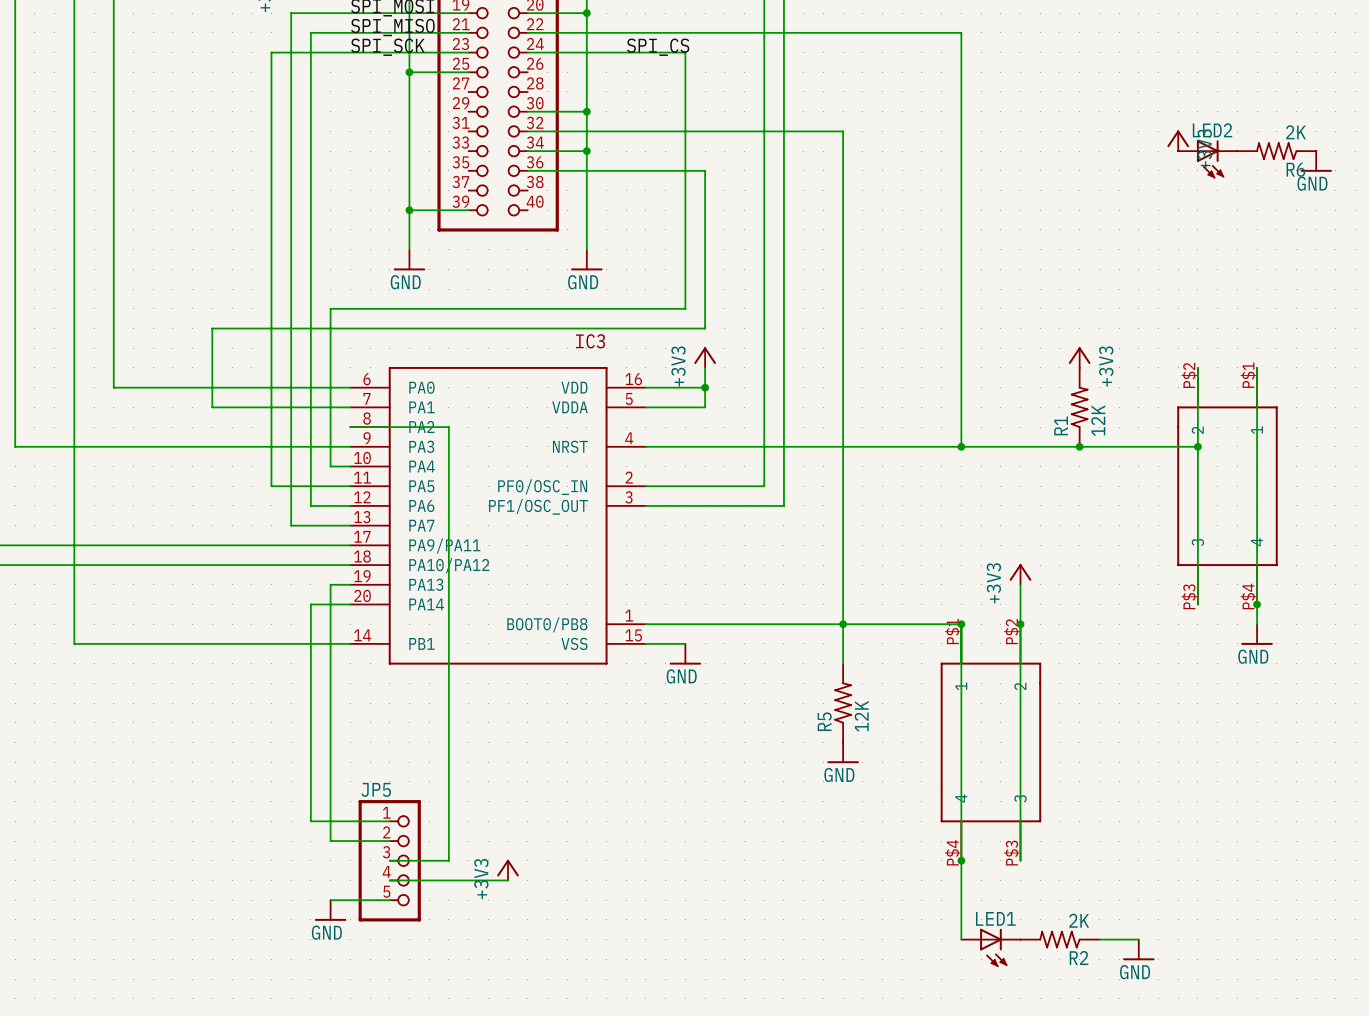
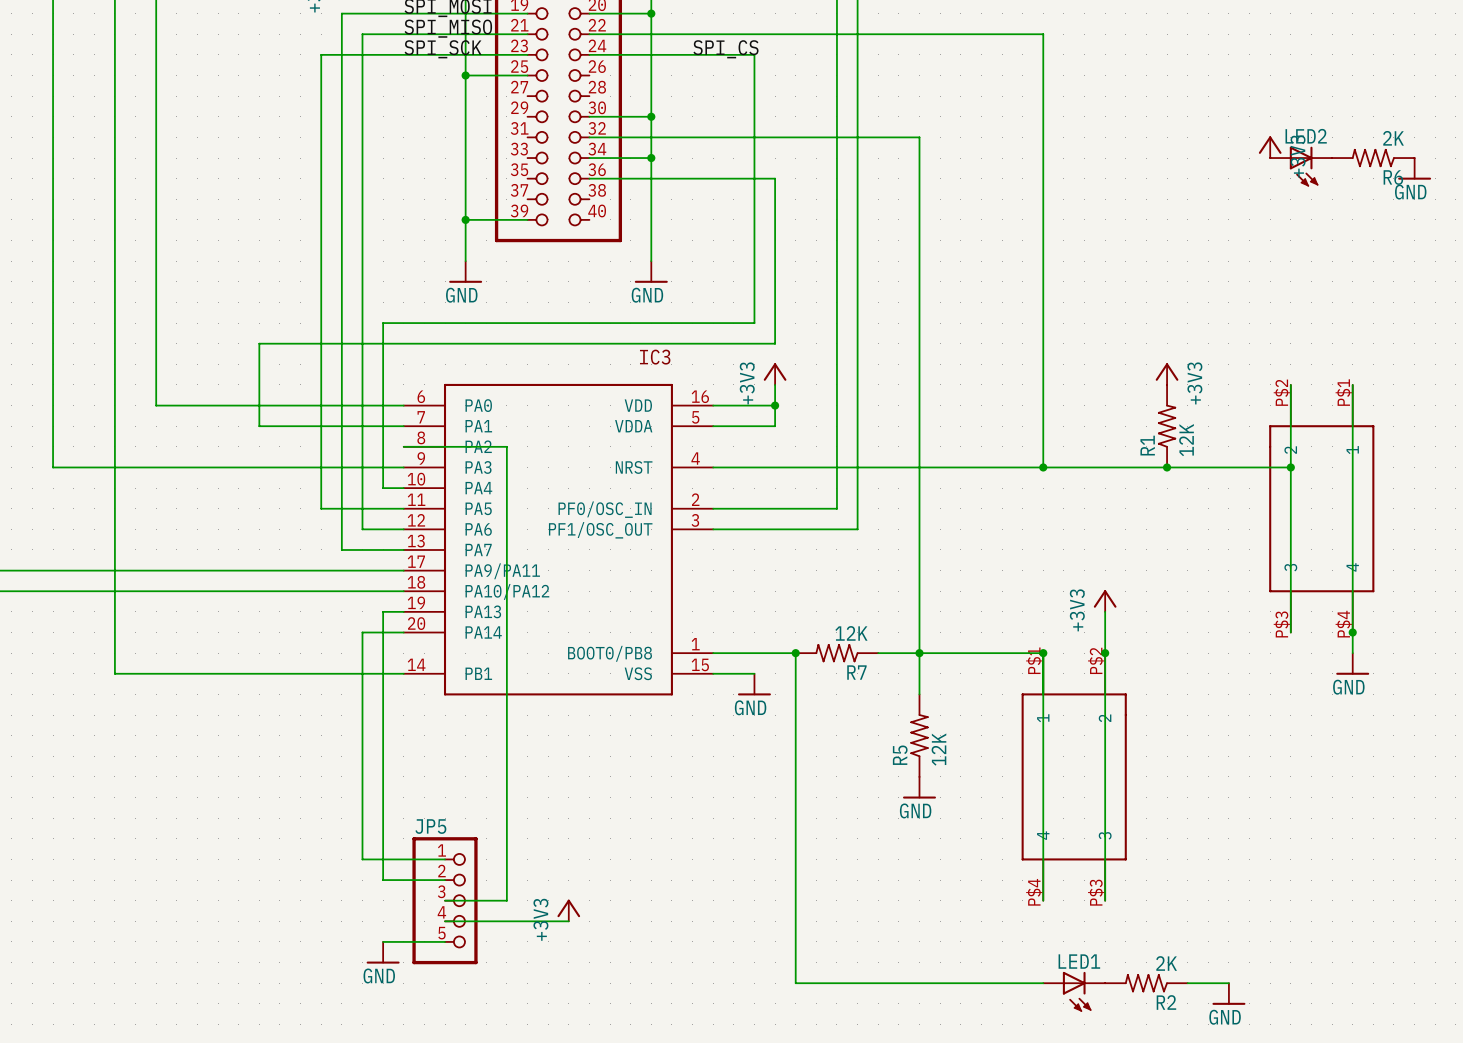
junction: none -> (795, 653)
R7: none -> 12K (836, 653)
wire: (961, 860) (961, 939) -> (795, 653) (795, 983) (1043, 983)
junction: (961, 860) -> none

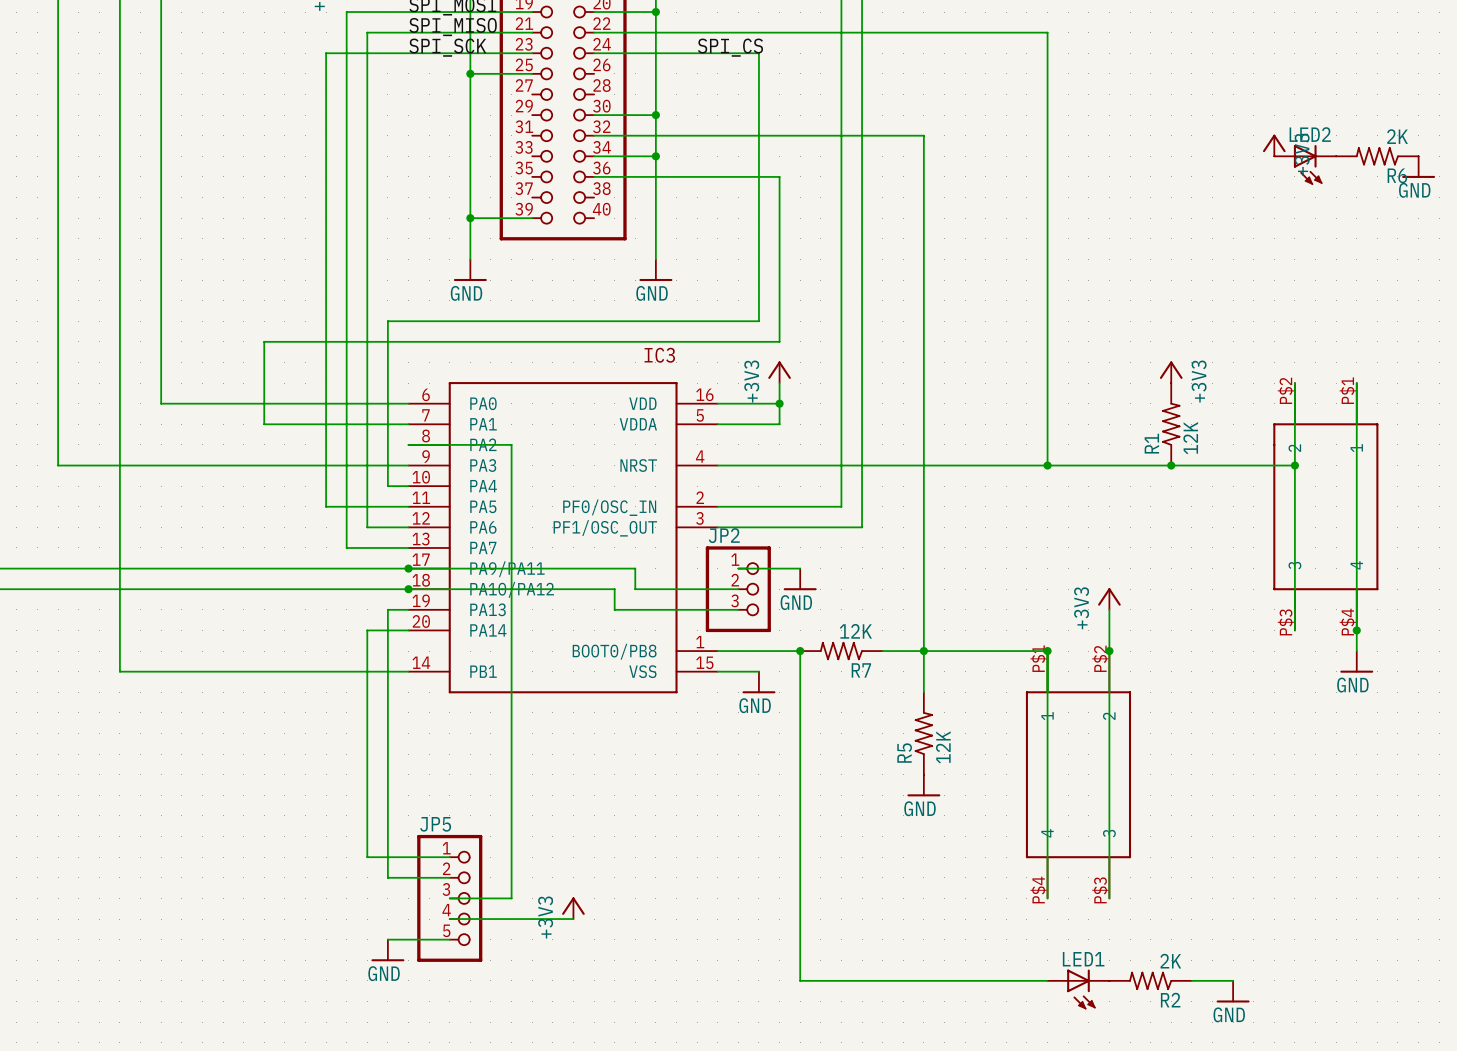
wire: none -> (408, 568) (635, 568) (635, 589) (738, 589)
junction: none -> (408, 568)
wire: none -> (738, 568) (800, 568)
power symbol: none -> GND (800, 579)
wire: none -> (408, 589) (614, 589) (614, 609) (738, 609)
junction: none -> (408, 589)
JP2: none -> (738, 589)

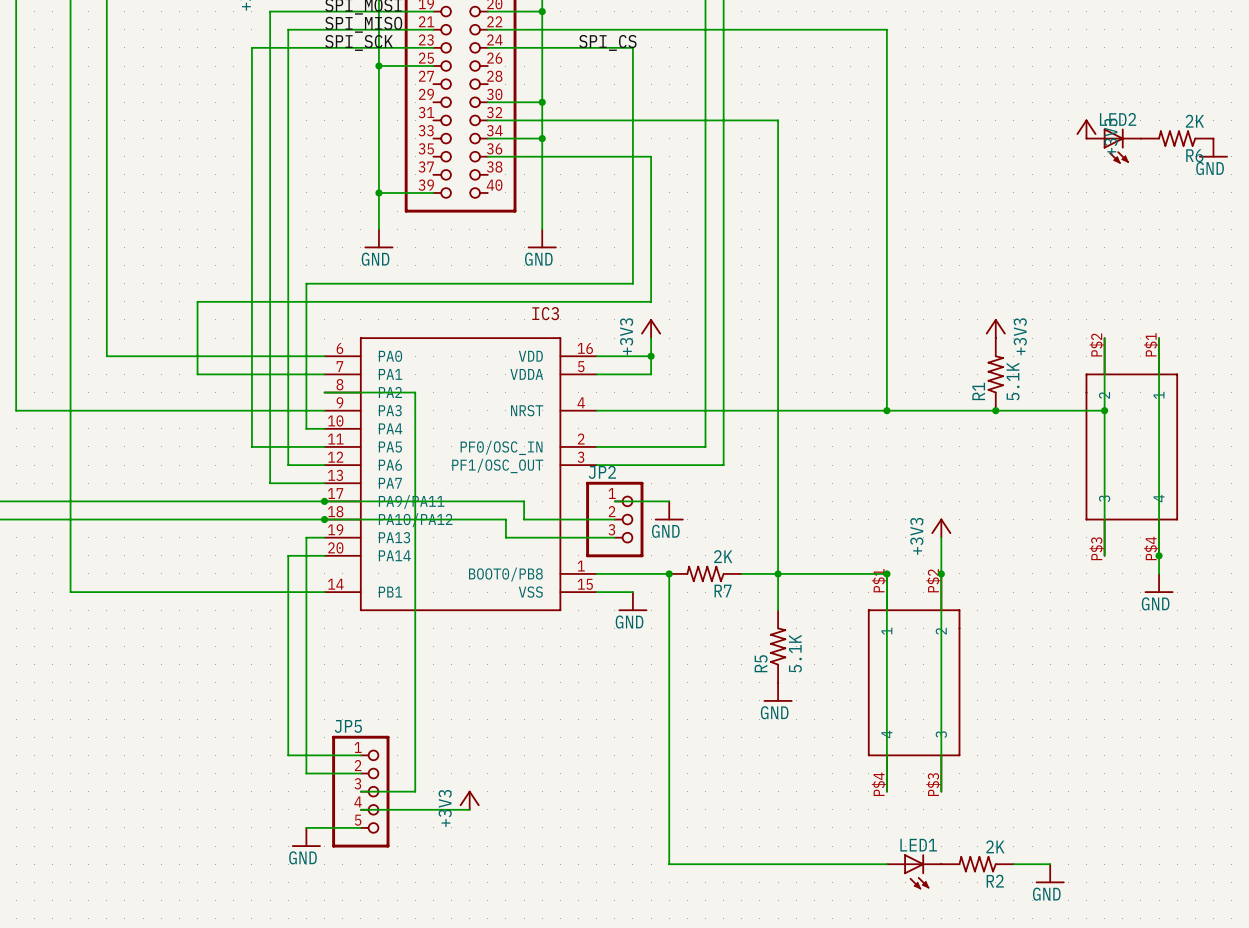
R1 value: 12K (1190, 438) -> 5.1K (1013, 381)
R7 value: 12K (855, 631) -> 2K (723, 556)
R5 value: 12K (943, 747) -> 5.1K (795, 653)

